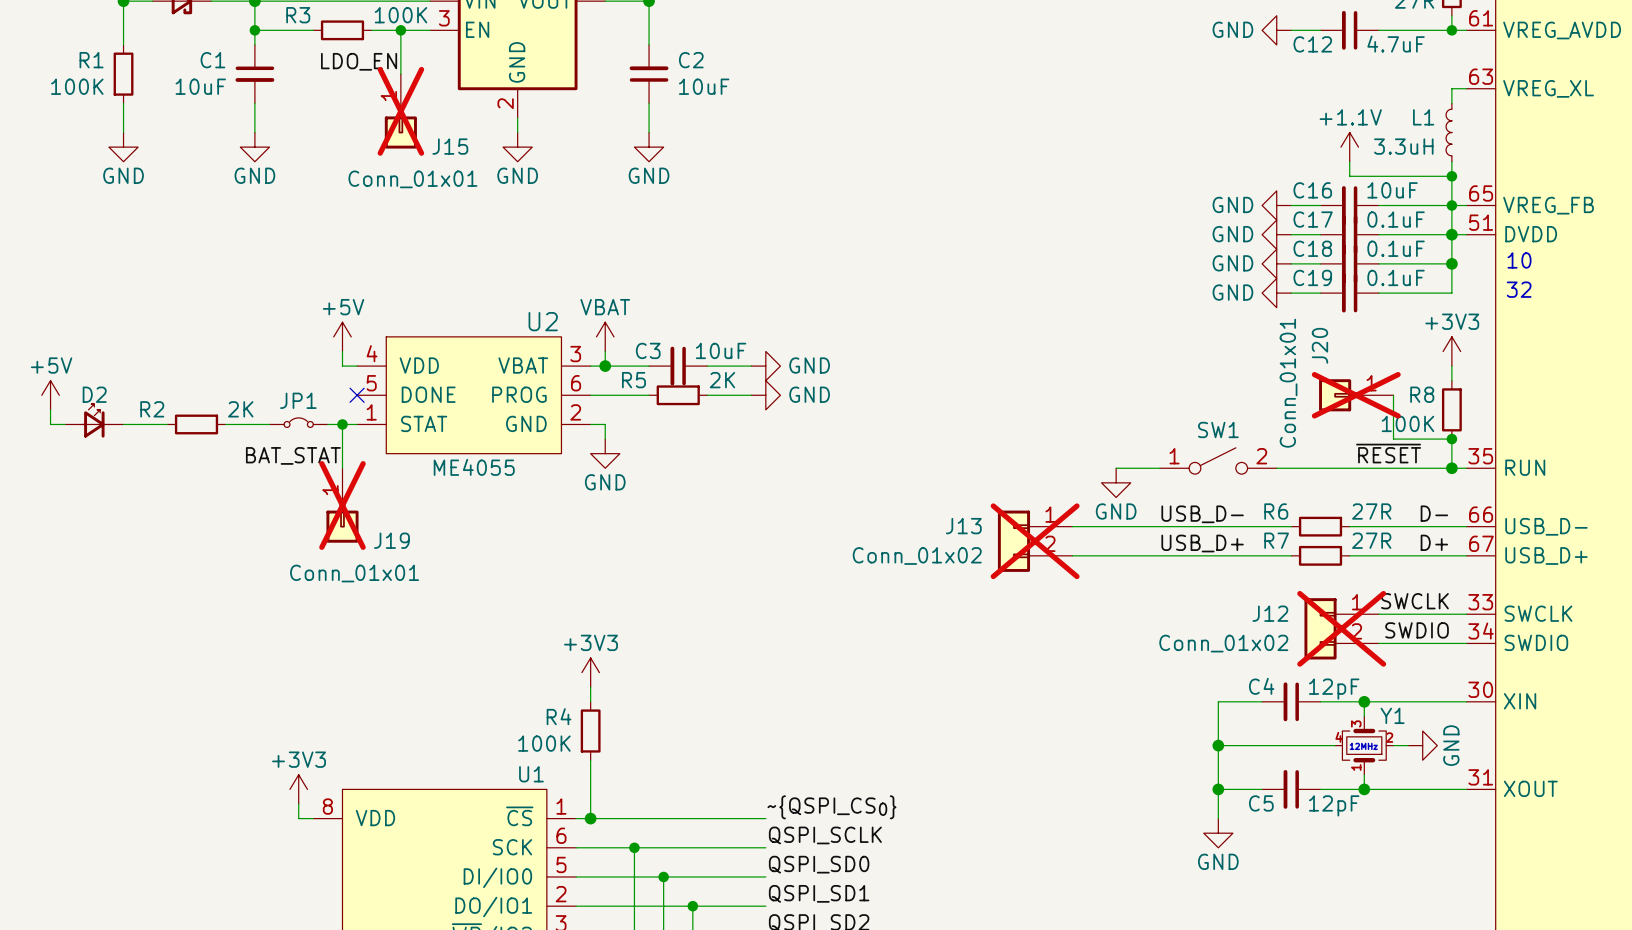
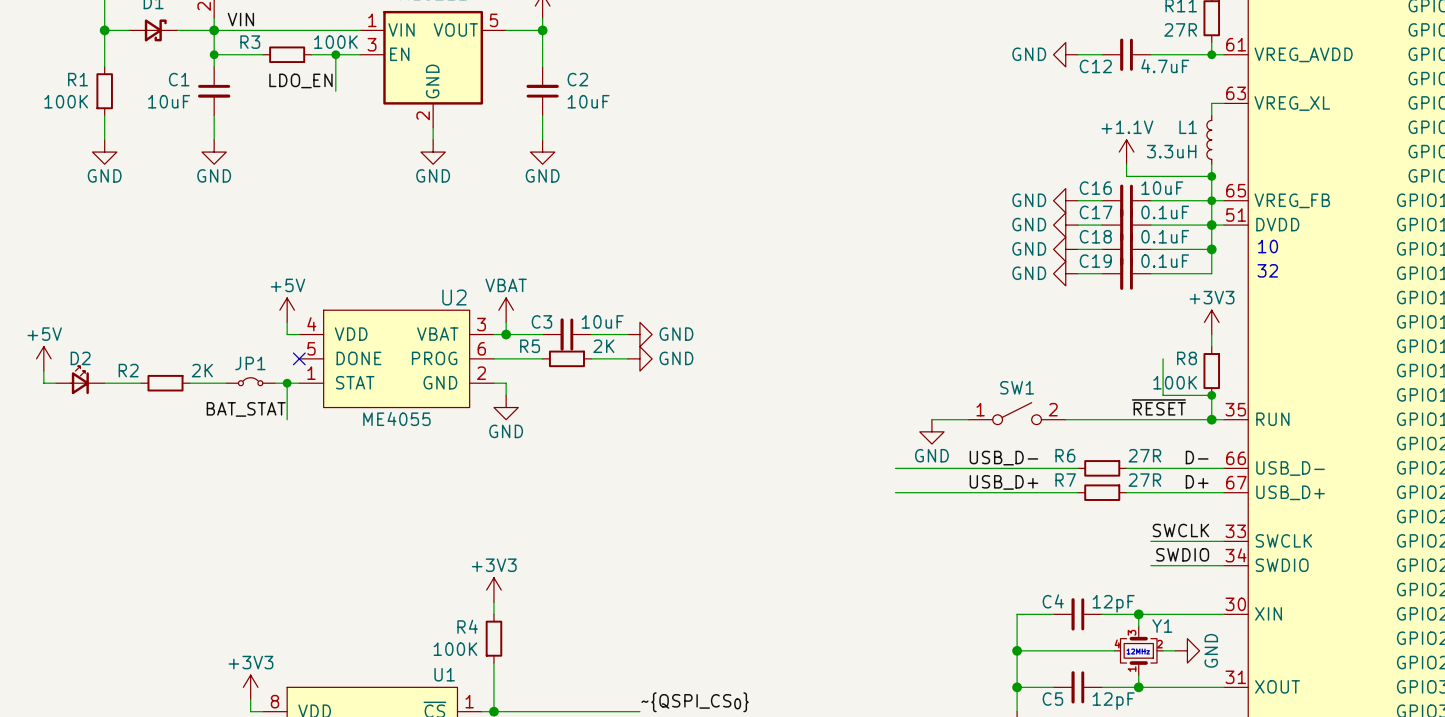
J15: Conn_01x01 (400, 111) -> none
J20: Conn_01x01 (1356, 395) -> none
J19: Conn_01x01 (342, 505) -> none
J13: Conn_01x02 (1035, 541) -> none
J12: Conn_01x02 (1341, 628) -> none

